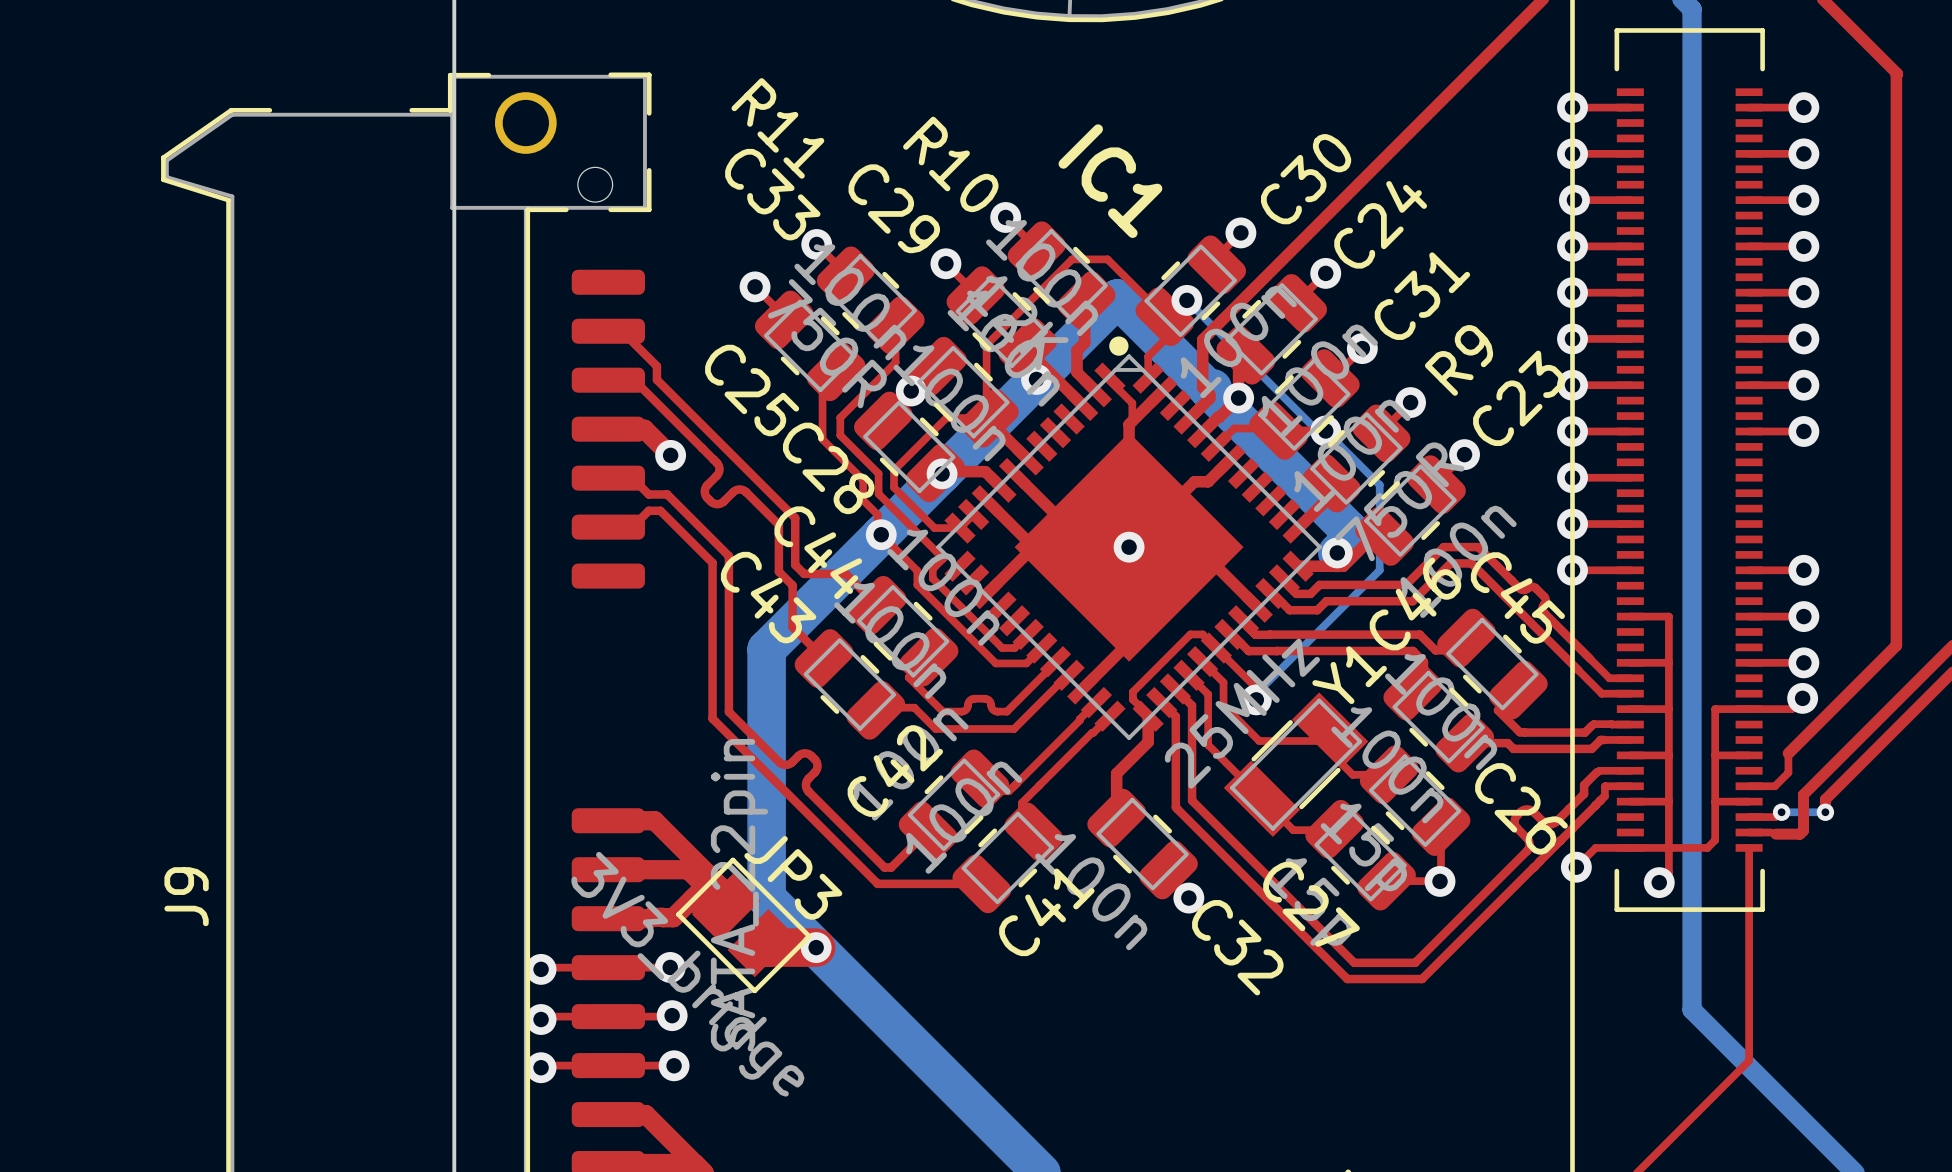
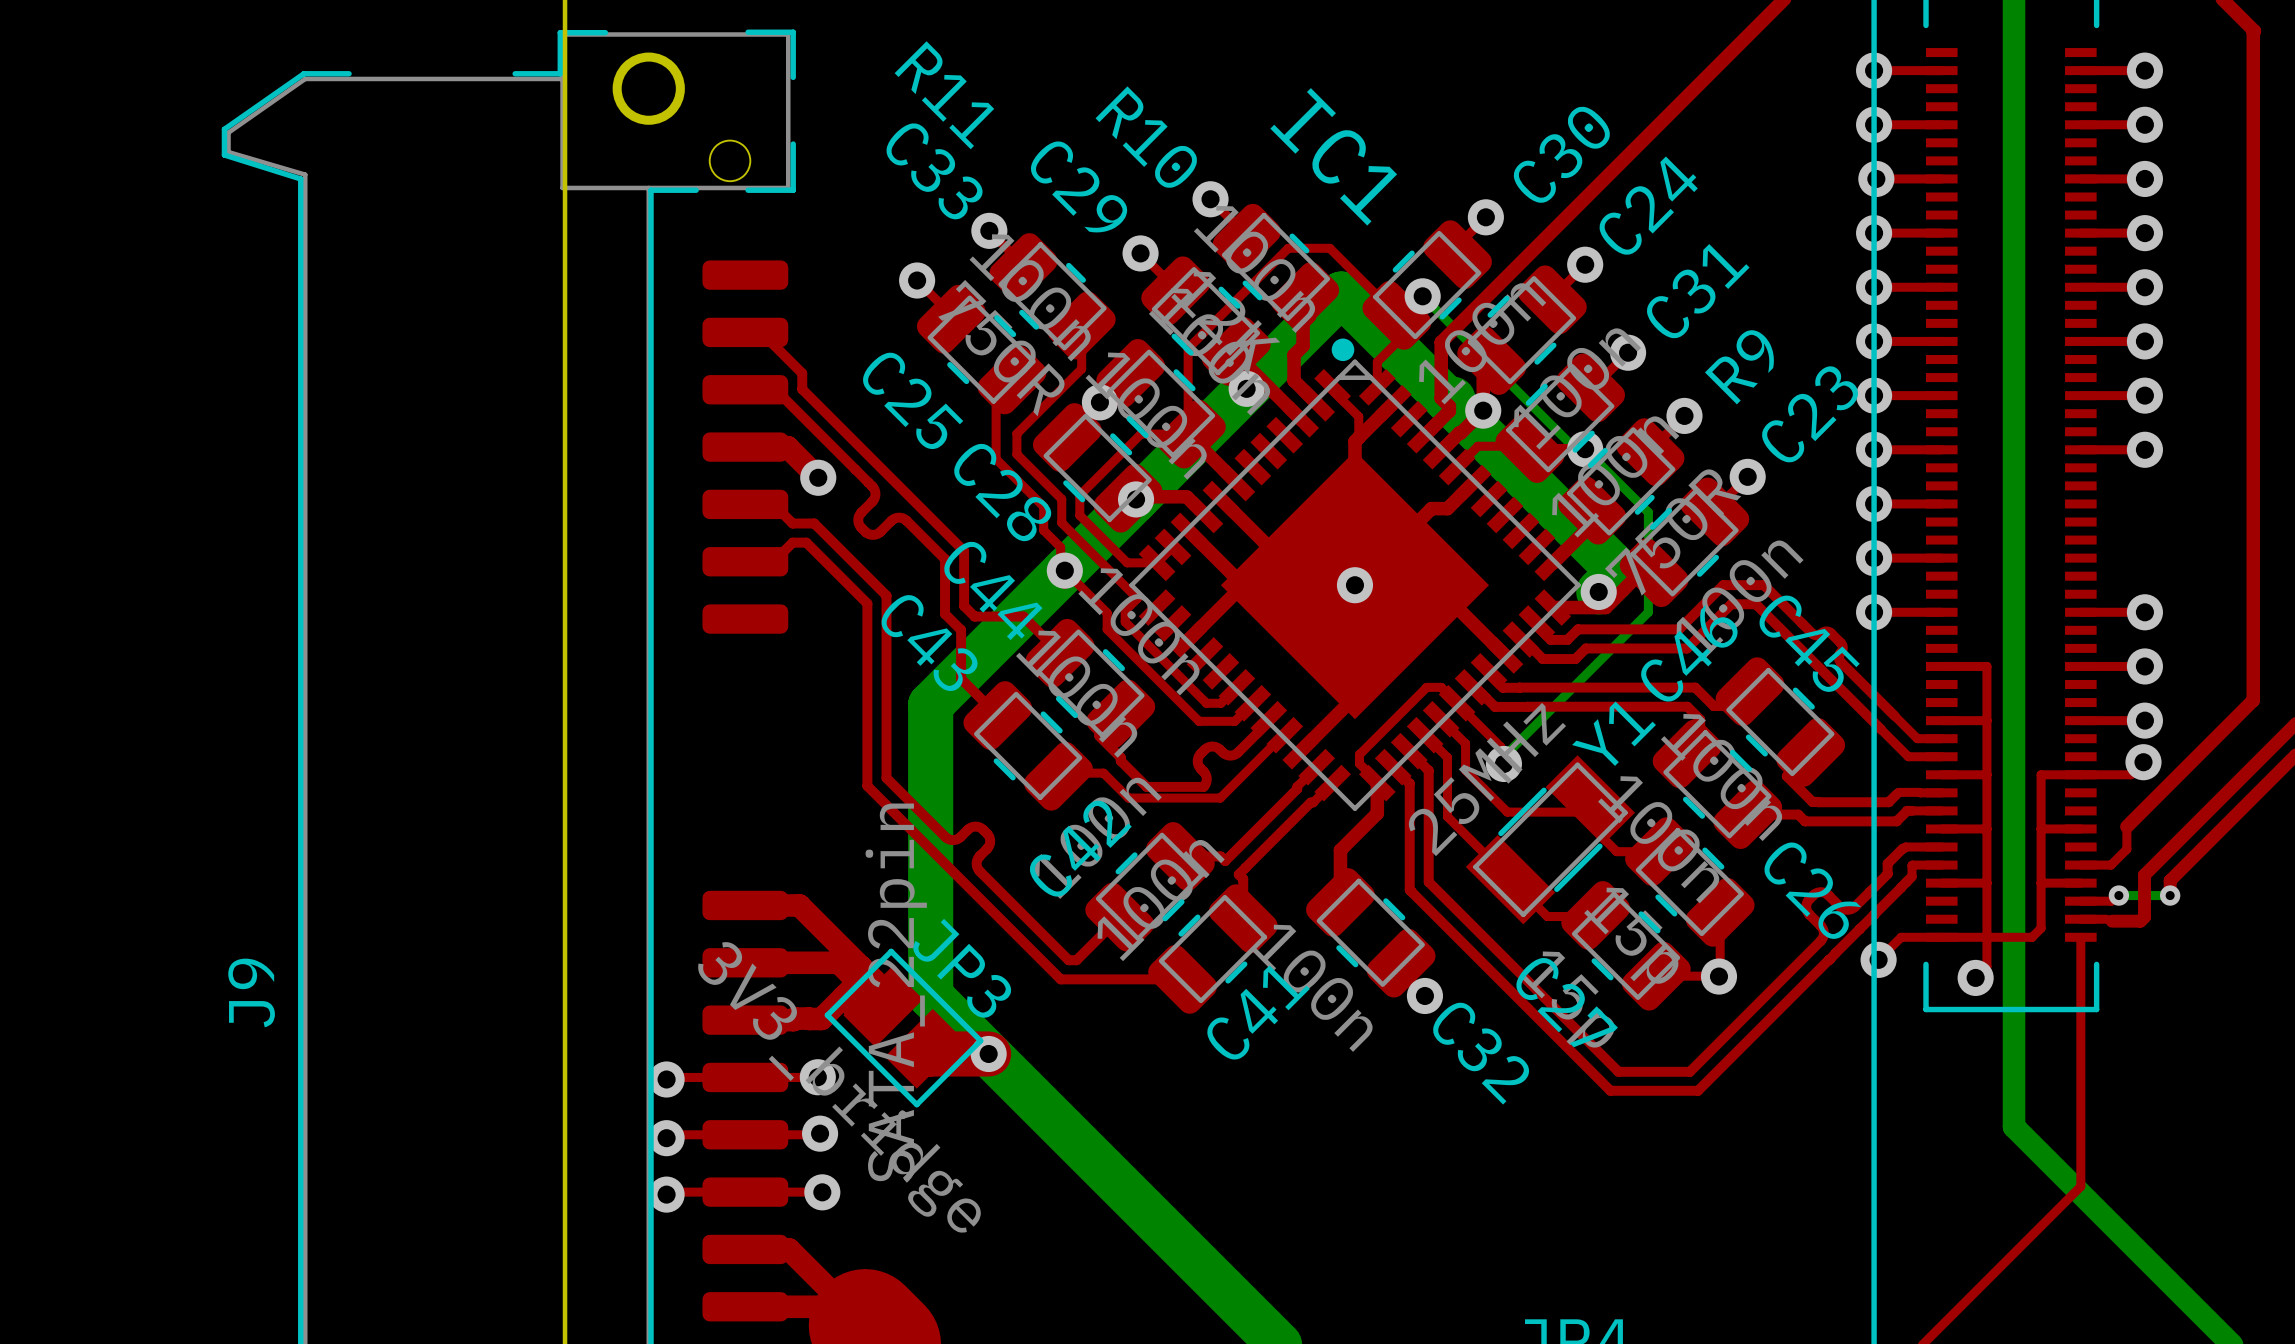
top track: (1055, 663) (1006, 711) (994, 710) (989, 701) (984, 698) (971, 699) (966, 709) (963, 711) (942, 711) (908, 677) (910, 675) -> (1268, 719) (1268, 721) (1235, 754) (1226, 754) (1212, 746) (1206, 748) (1200, 753) (1198, 764) (1206, 777) (1203, 786) (1146, 786) (1098, 735)
top track: (1079, 720) (1009, 791) (992, 791) -> (1297, 786) (1297, 789) (1225, 861) (1220, 856) (1180, 856)
top track: (1092, 732) (1021, 802) (1021, 820) -> (1313, 802) (1310, 802) (1238, 874) (1243, 879) (1243, 918)

